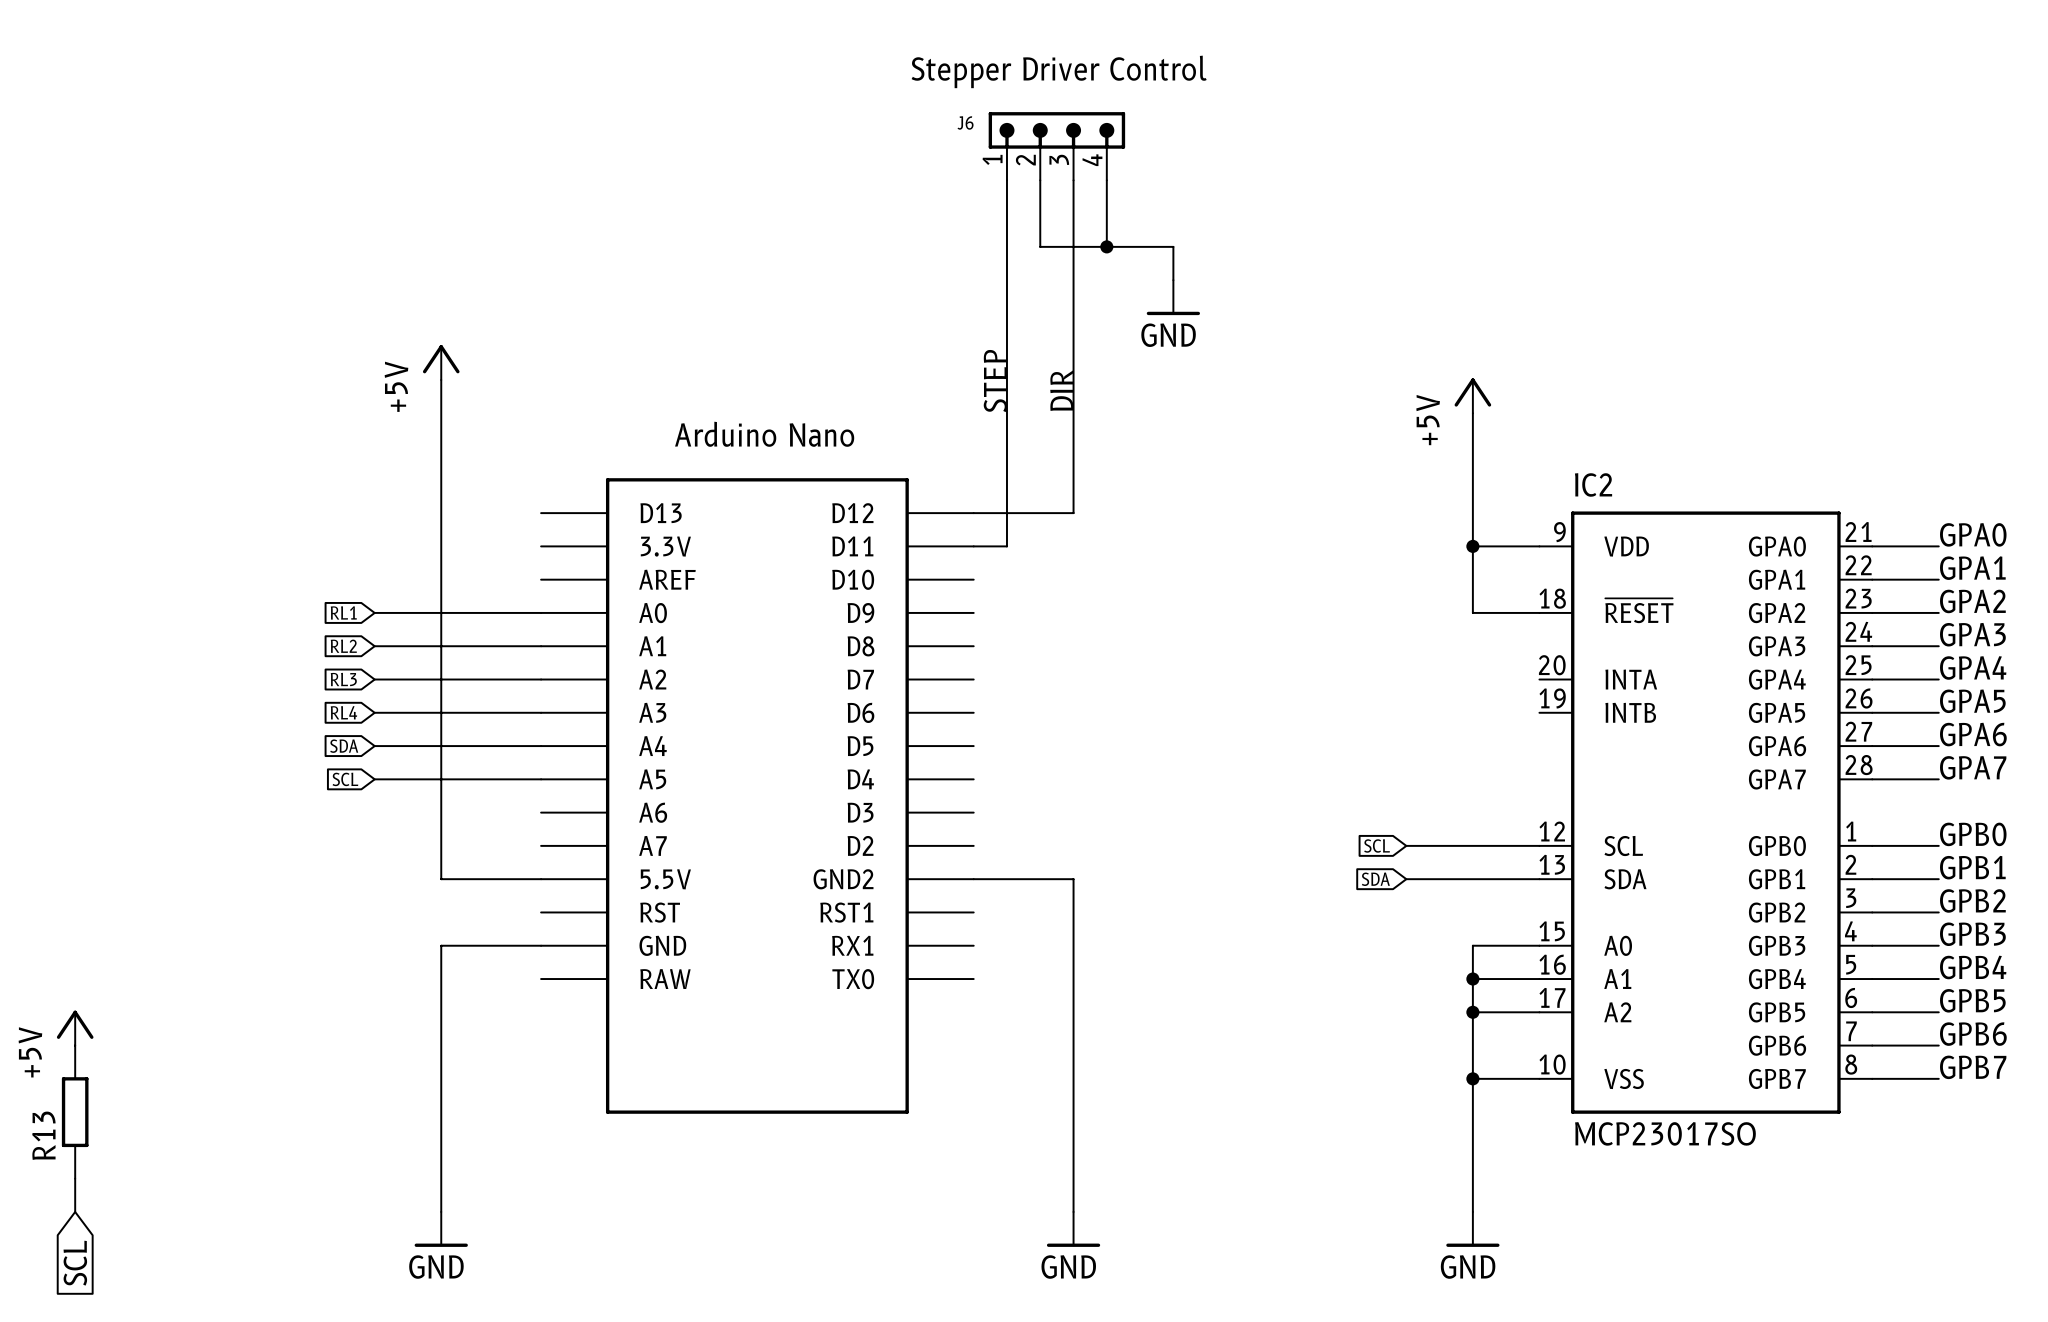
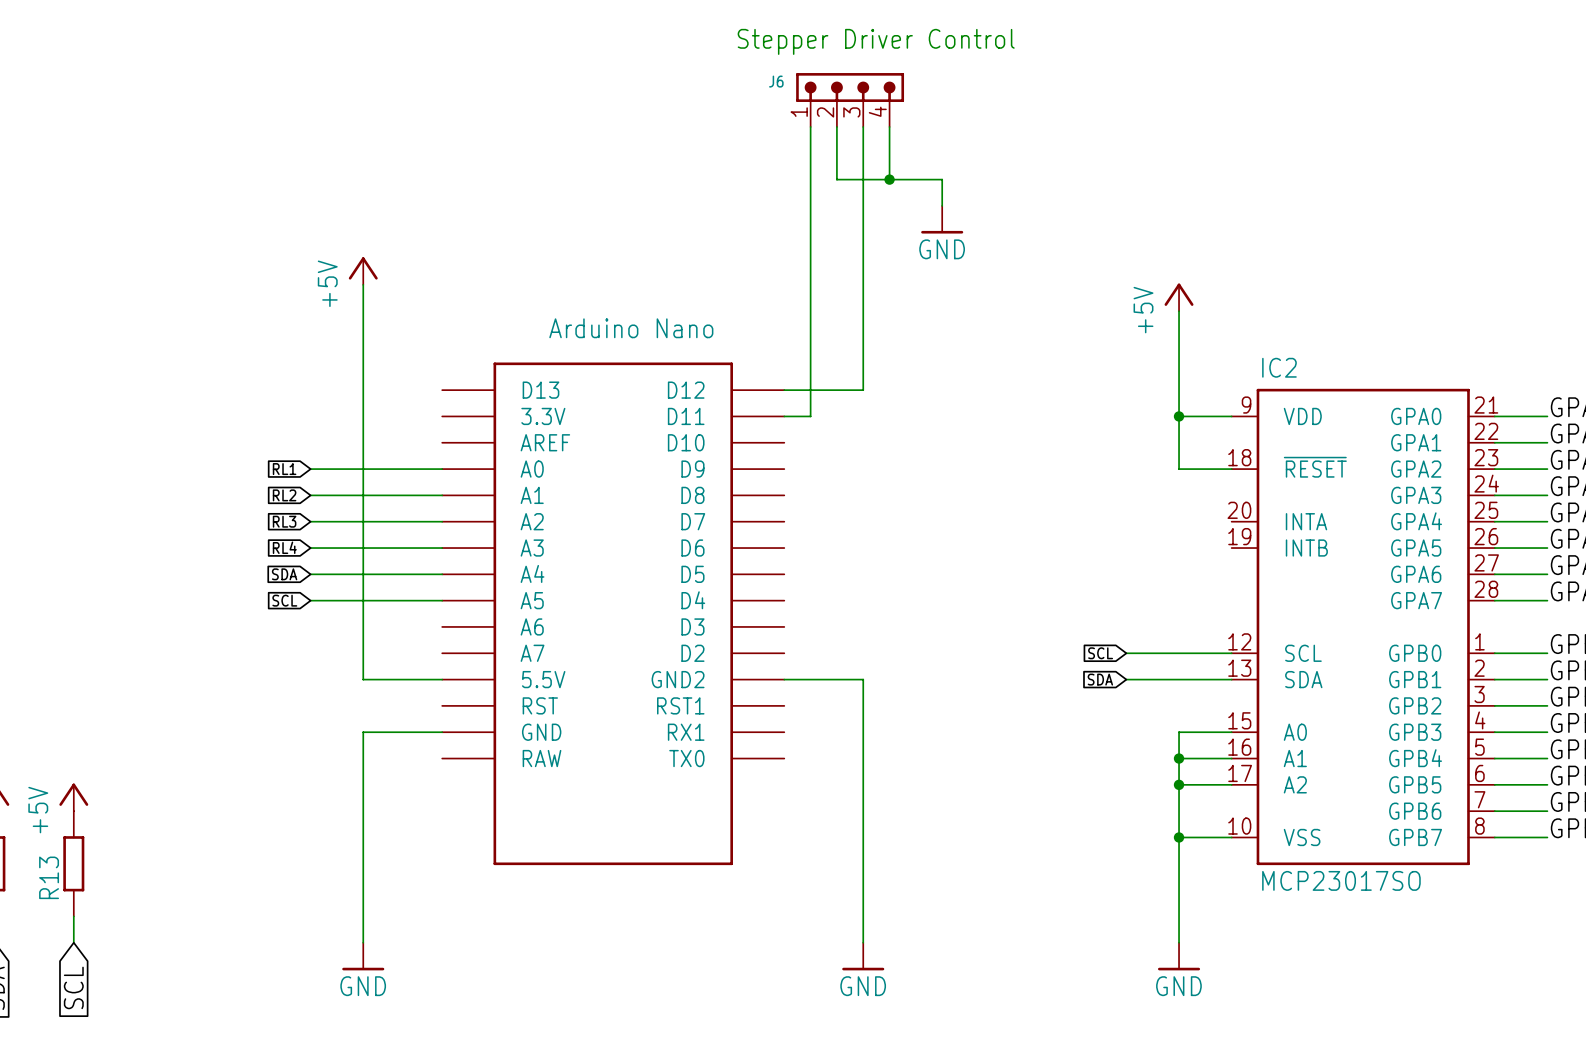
label: STEP (995, 381) -> none
label: DIR (1061, 390) -> none

